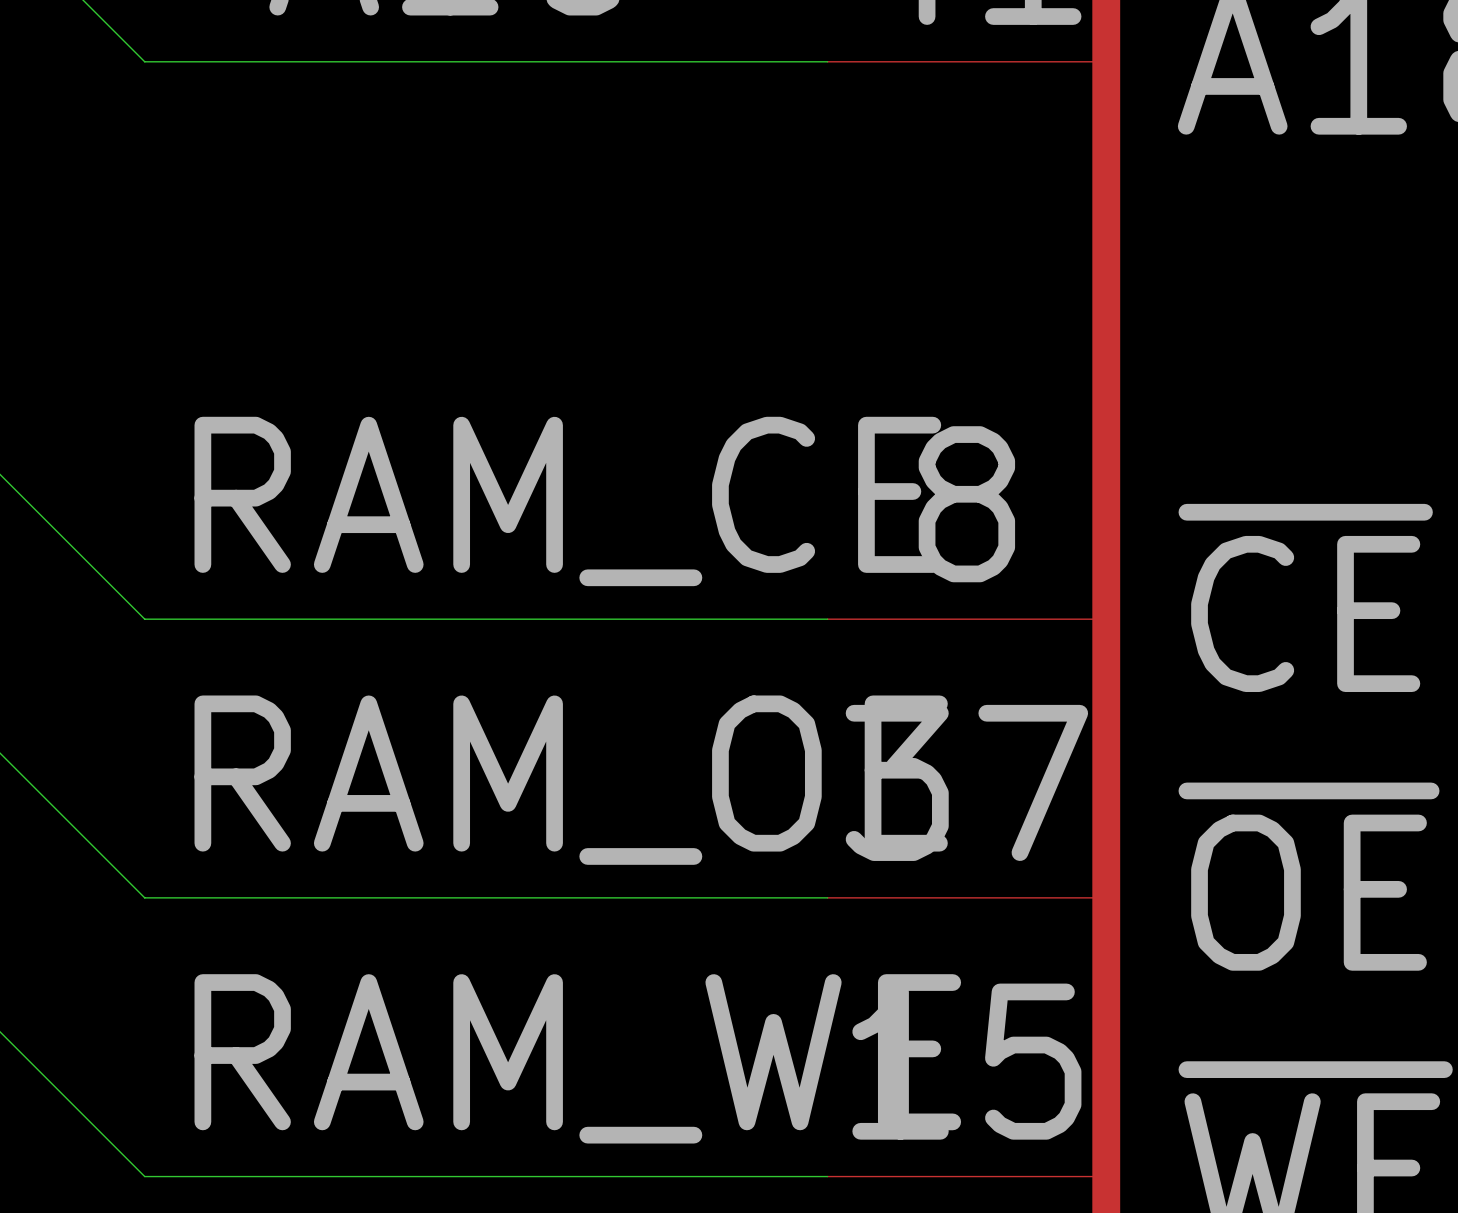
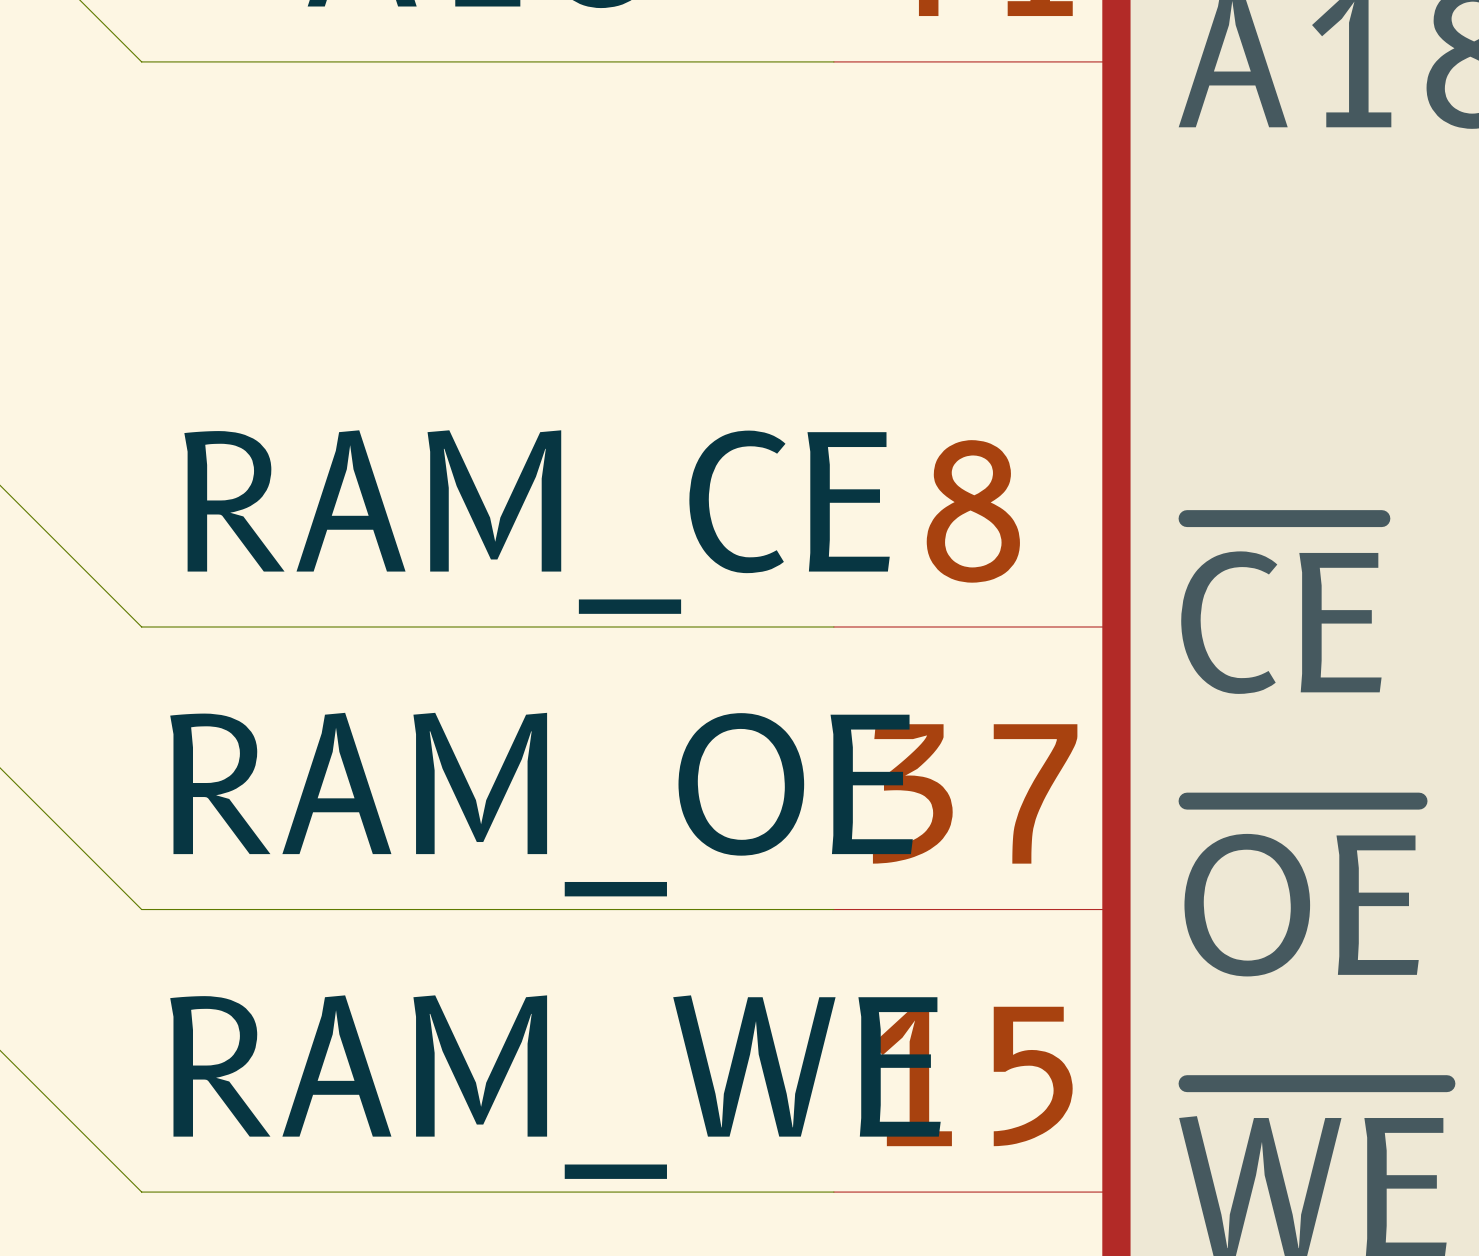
label position: RAM_CE (567, 501) -> RAM_CE (537, 522)

